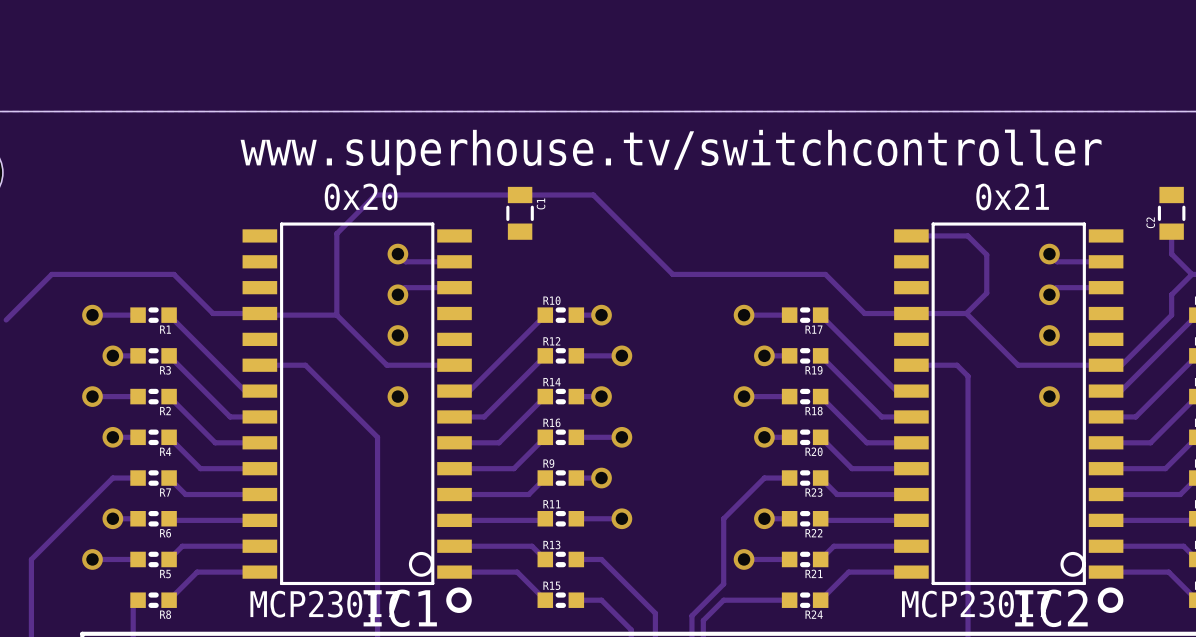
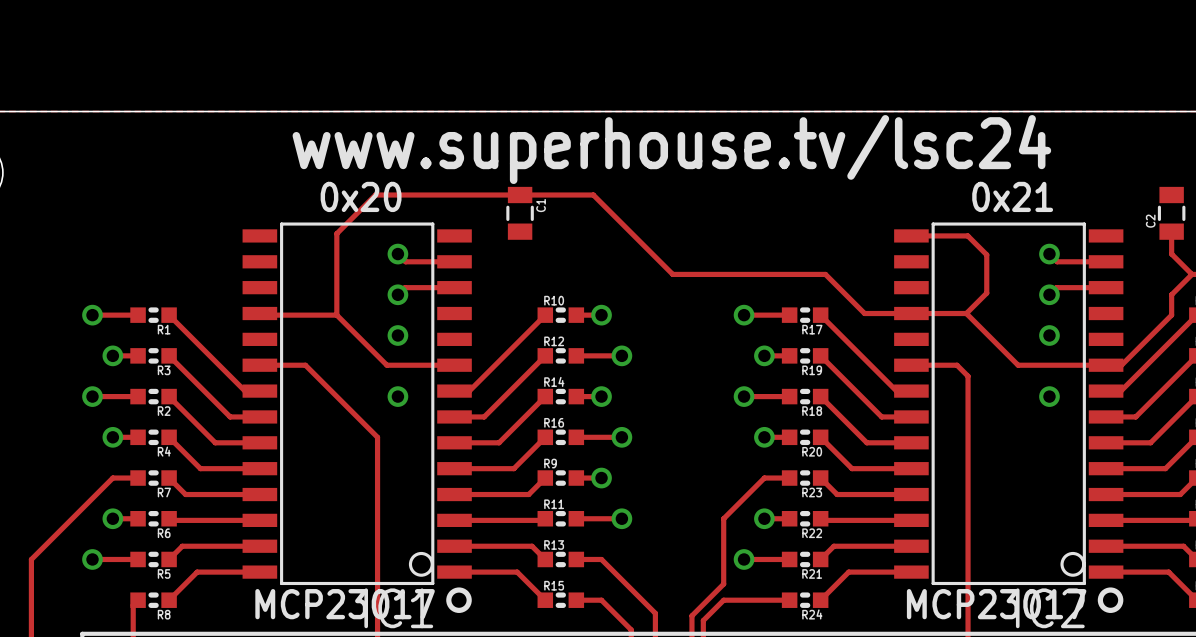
text: www.superhouse.tv/switchcontroller (671, 152) -> www.superhouse.tv/lsc24 (671, 149)
track: (259, 313) (213, 313) (173, 274) (51, 274) (6, 319) -> none

